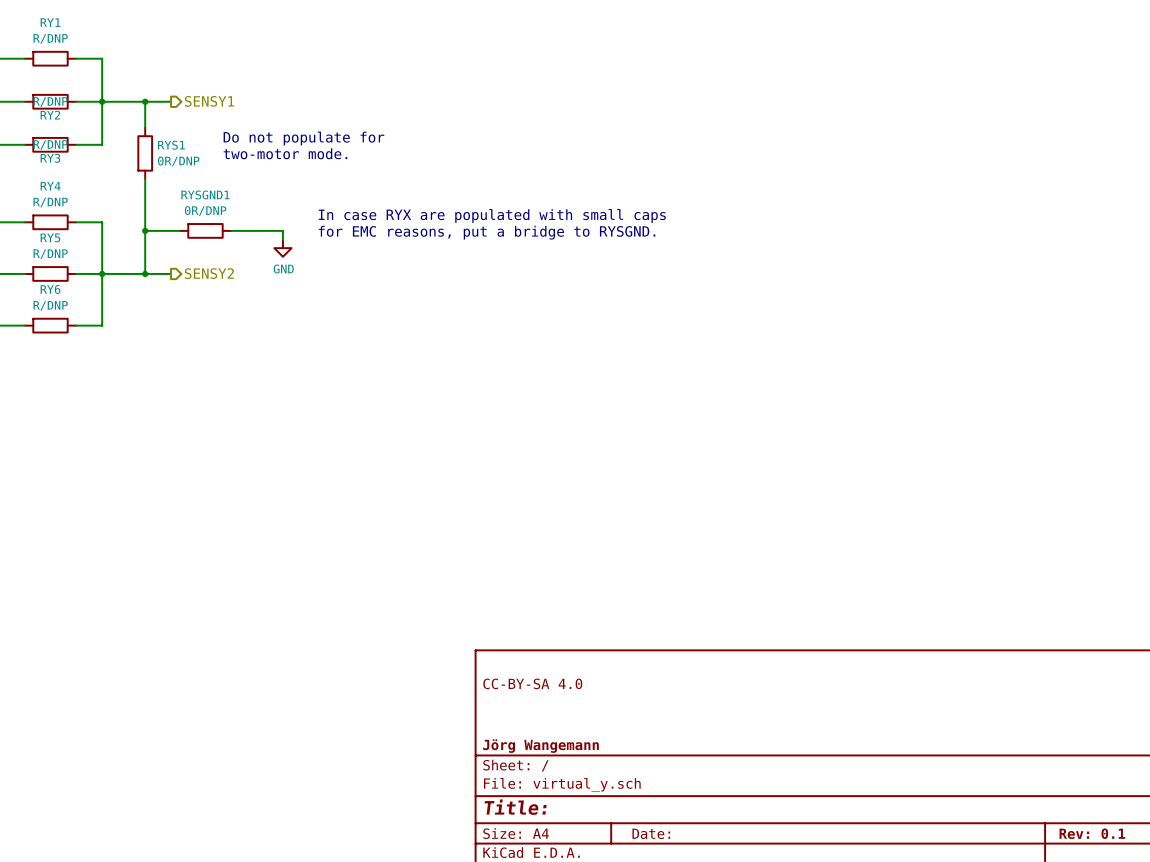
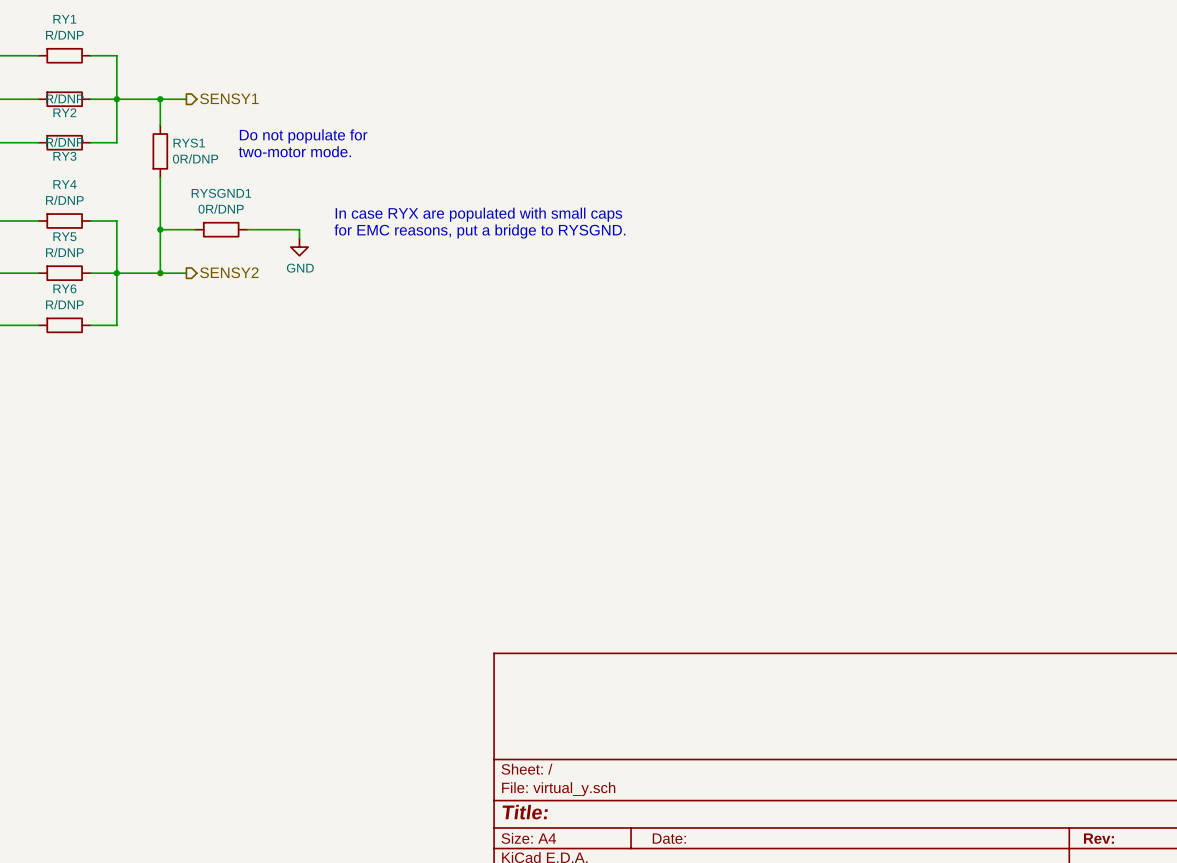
title block: CC-BY-SA 4.0 (532, 683) -> none
title block: Jörg Wangemann (540, 746) -> none
title block: Rev: 0.1 (1092, 833) -> Rev: (1098, 838)

